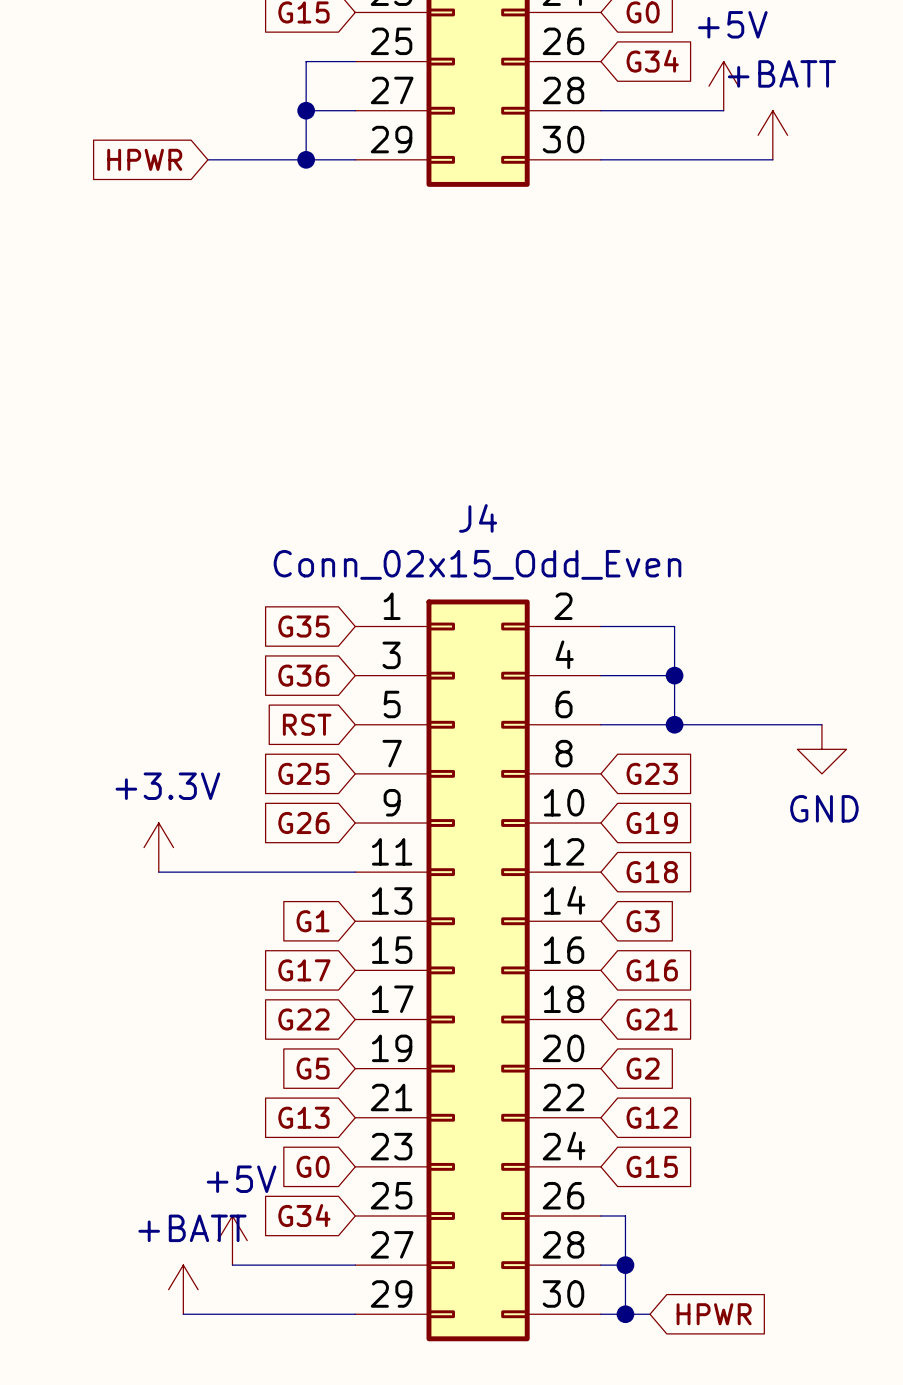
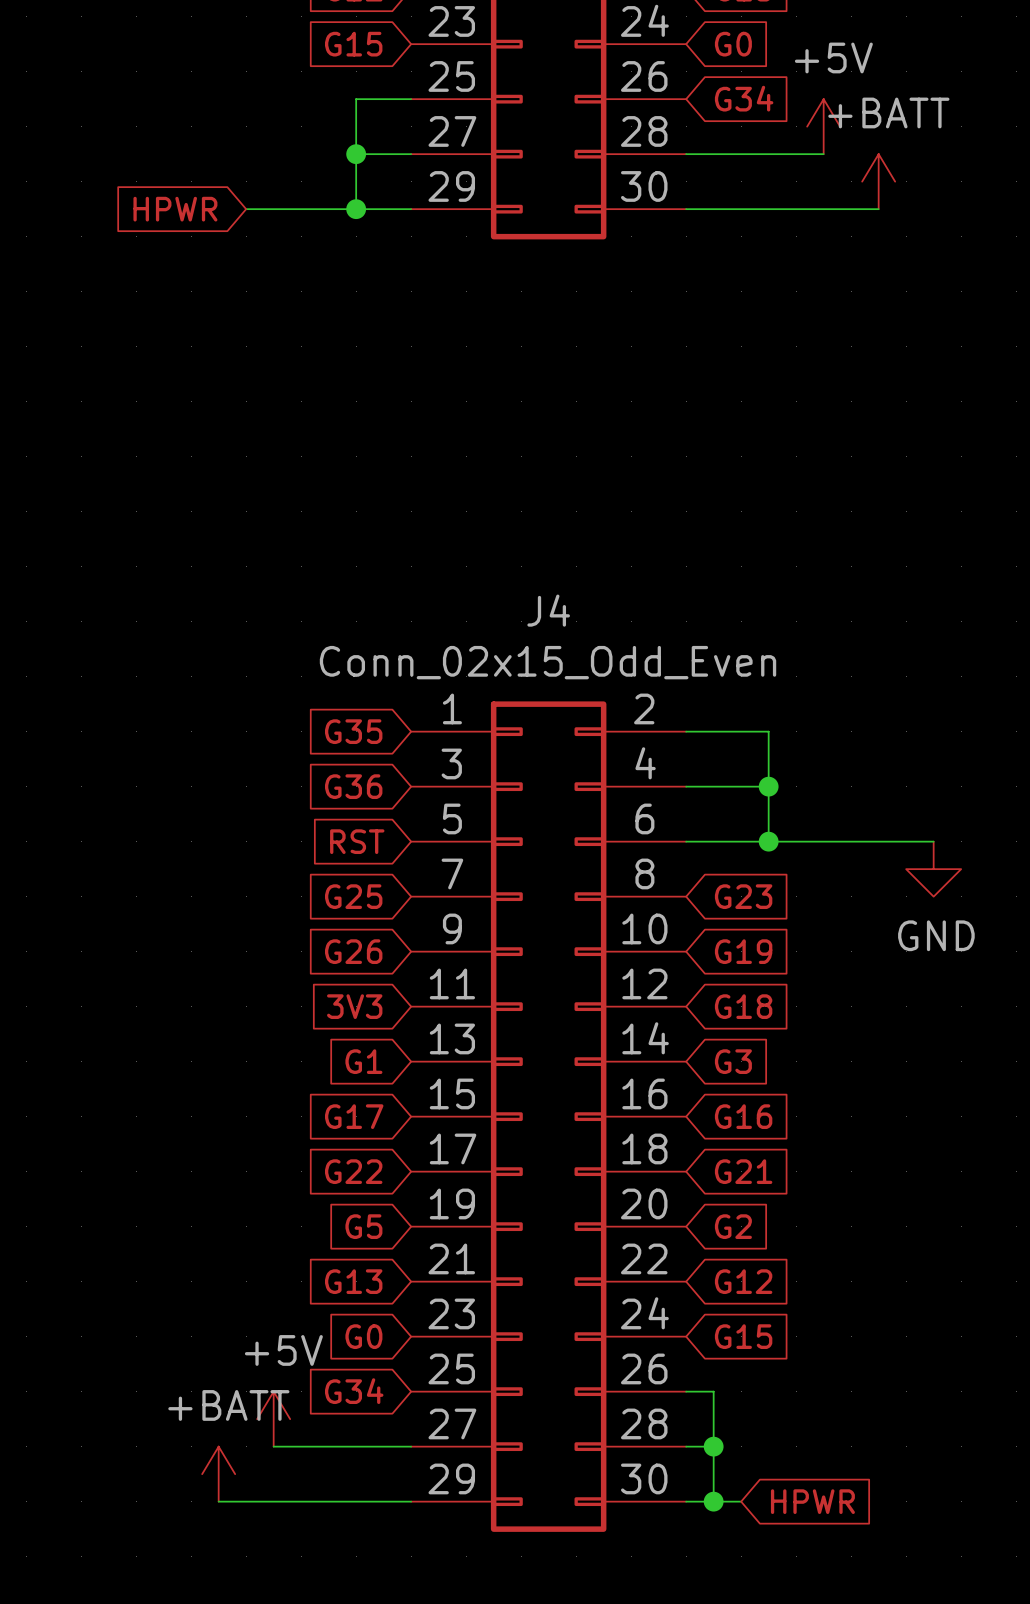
power symbol: +3.3V (158, 847) -> none
wire: (158, 872) (355, 872) -> none
global label: none -> 3V3 (354, 1006)

